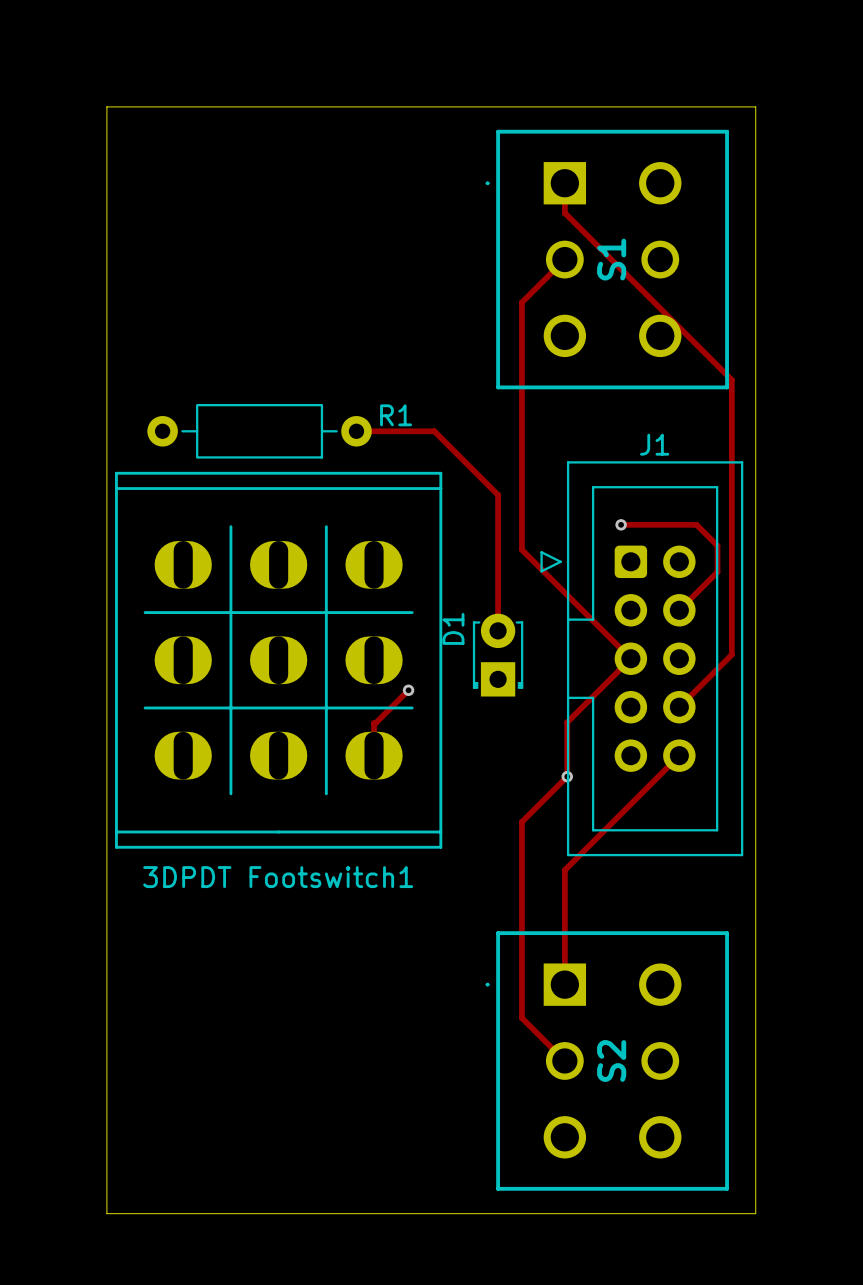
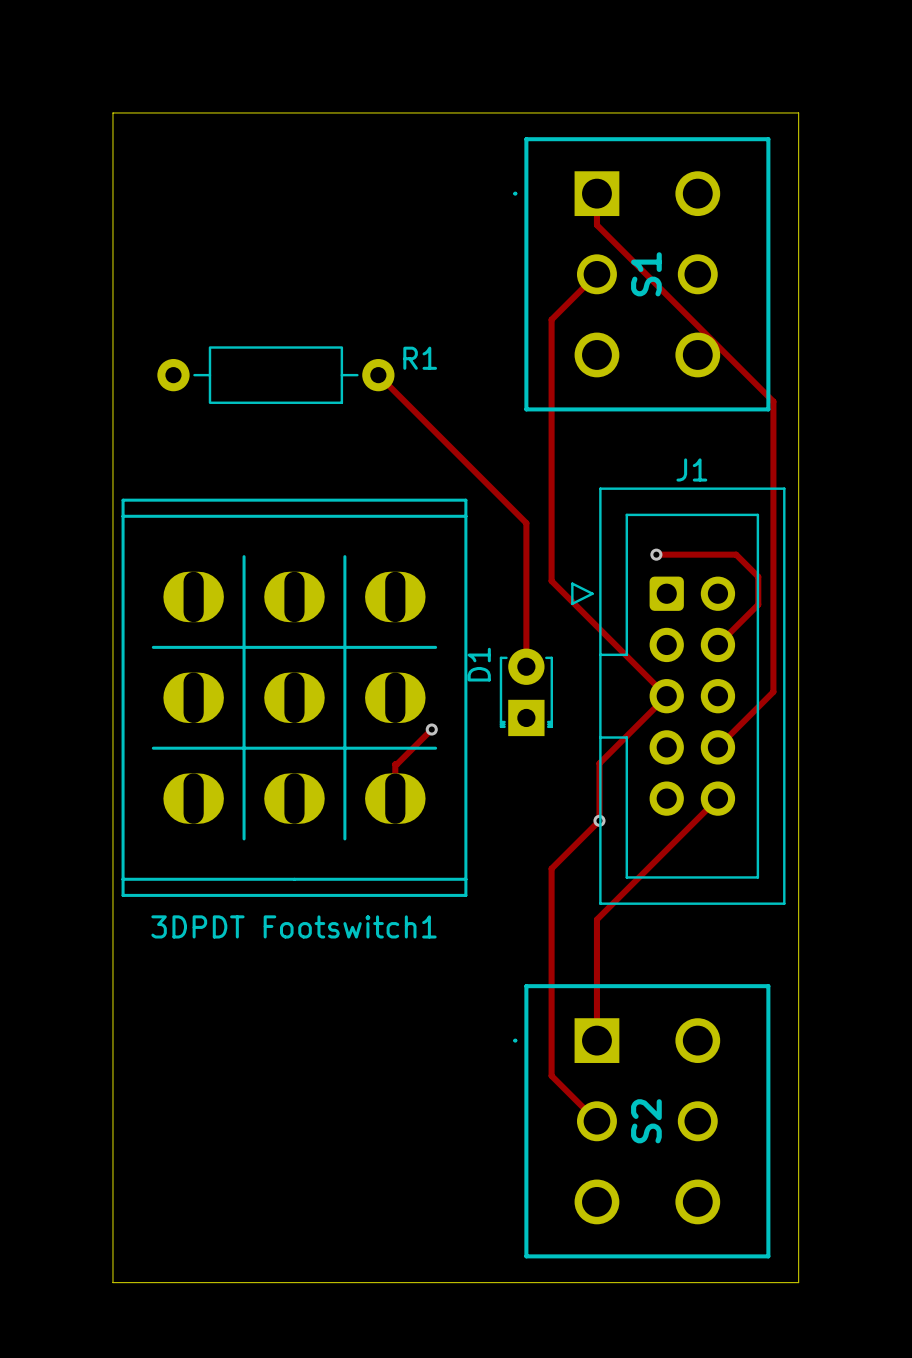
R1 position: (259, 431) -> (275, 375)
track: (356, 431) (434, 431) -> (378, 375) (459, 455)

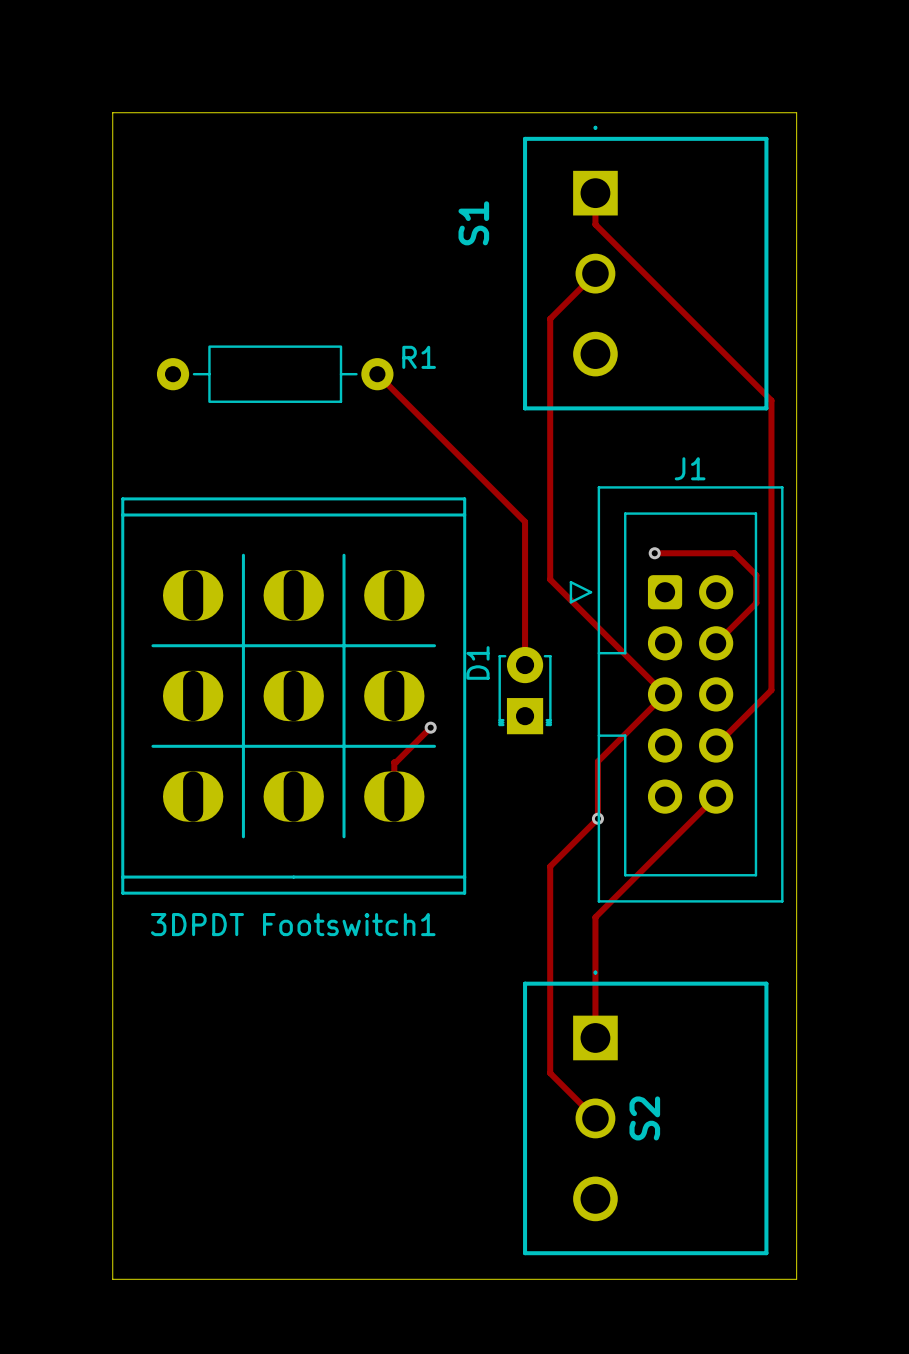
S1 footprint: [513, 137, 771, 412] -> [523, 125, 769, 411]
S1 name position: S1 (646, 274) -> S1 (473, 223)
S2 footprint: [513, 984, 771, 1259] -> [523, 970, 769, 1256]

